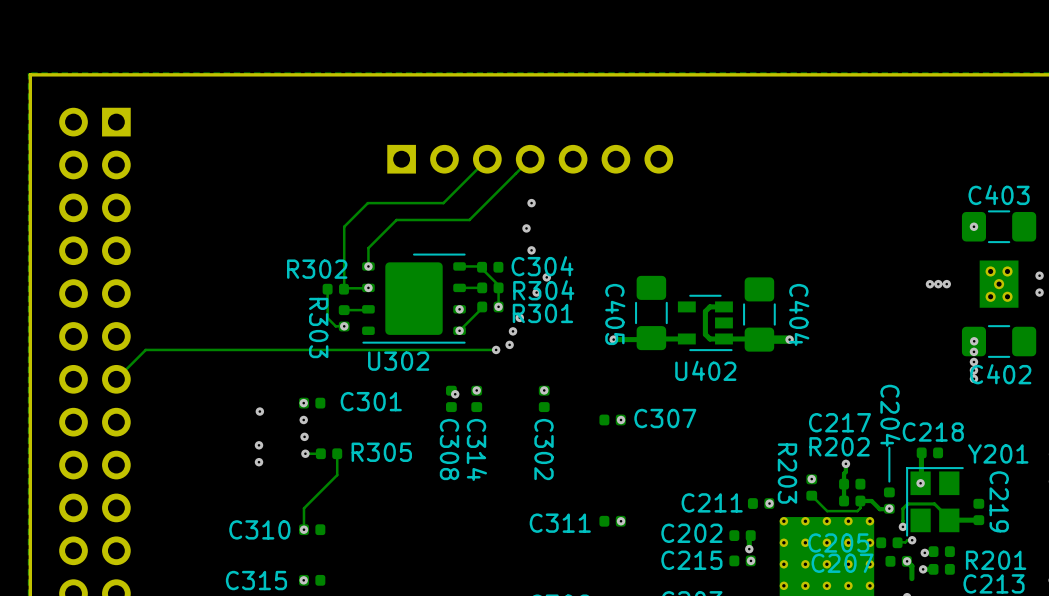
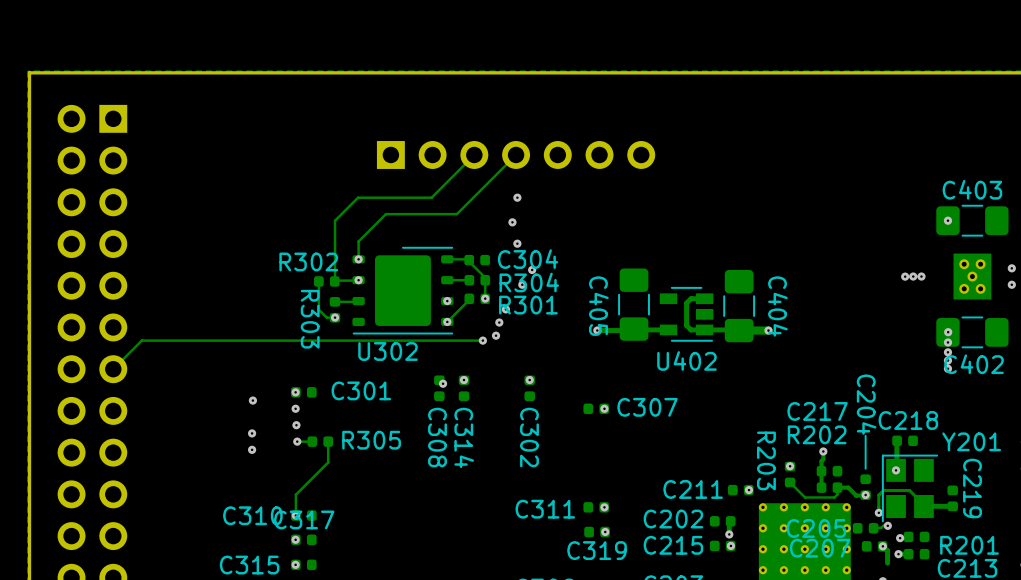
C319: none -> (597, 531)
via: none -> (605, 531)
via: none -> (295, 539)
C317: none -> (303, 539)

